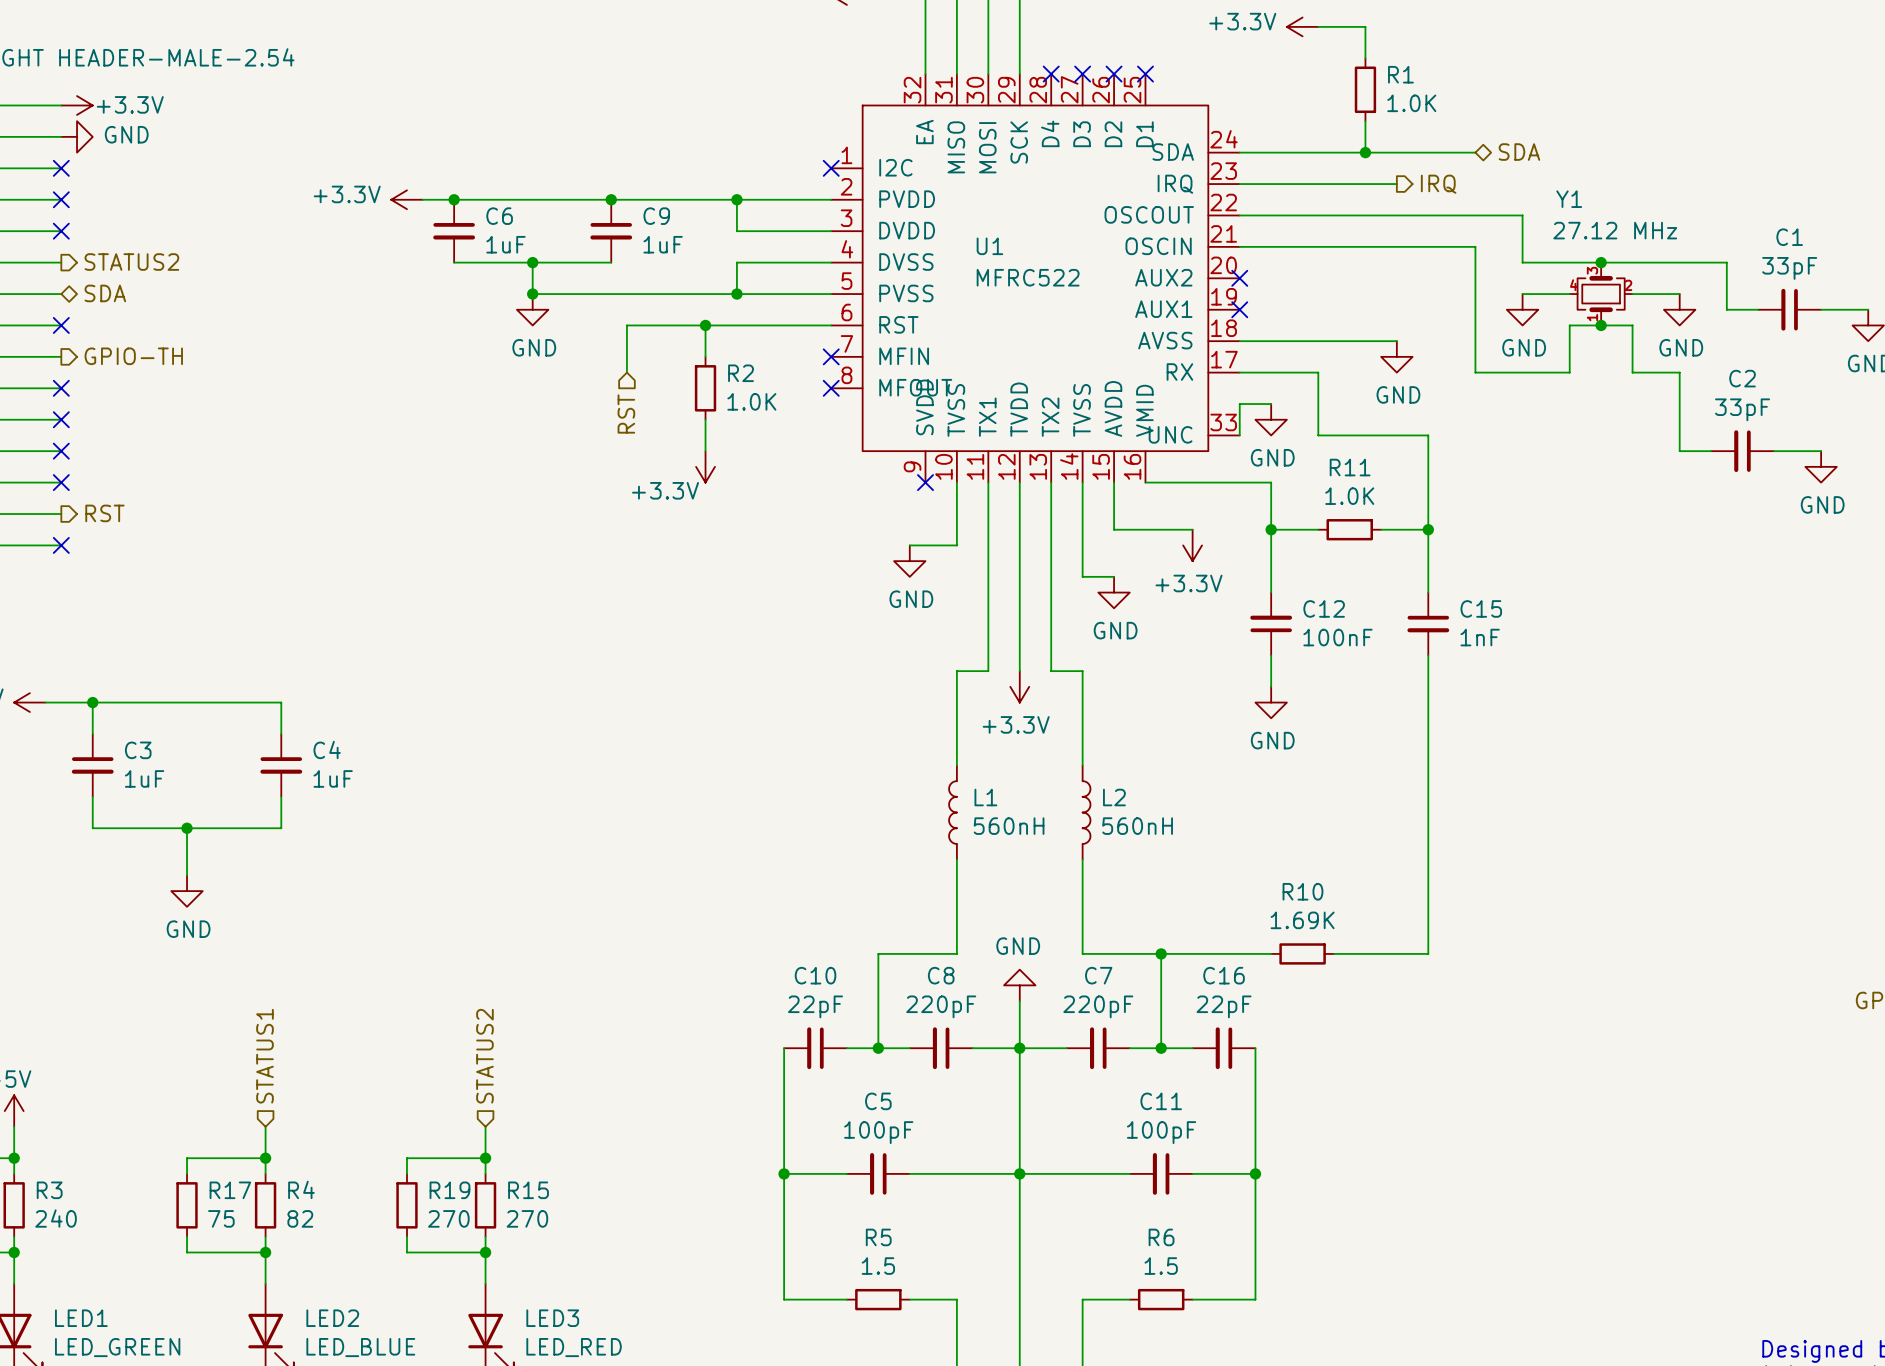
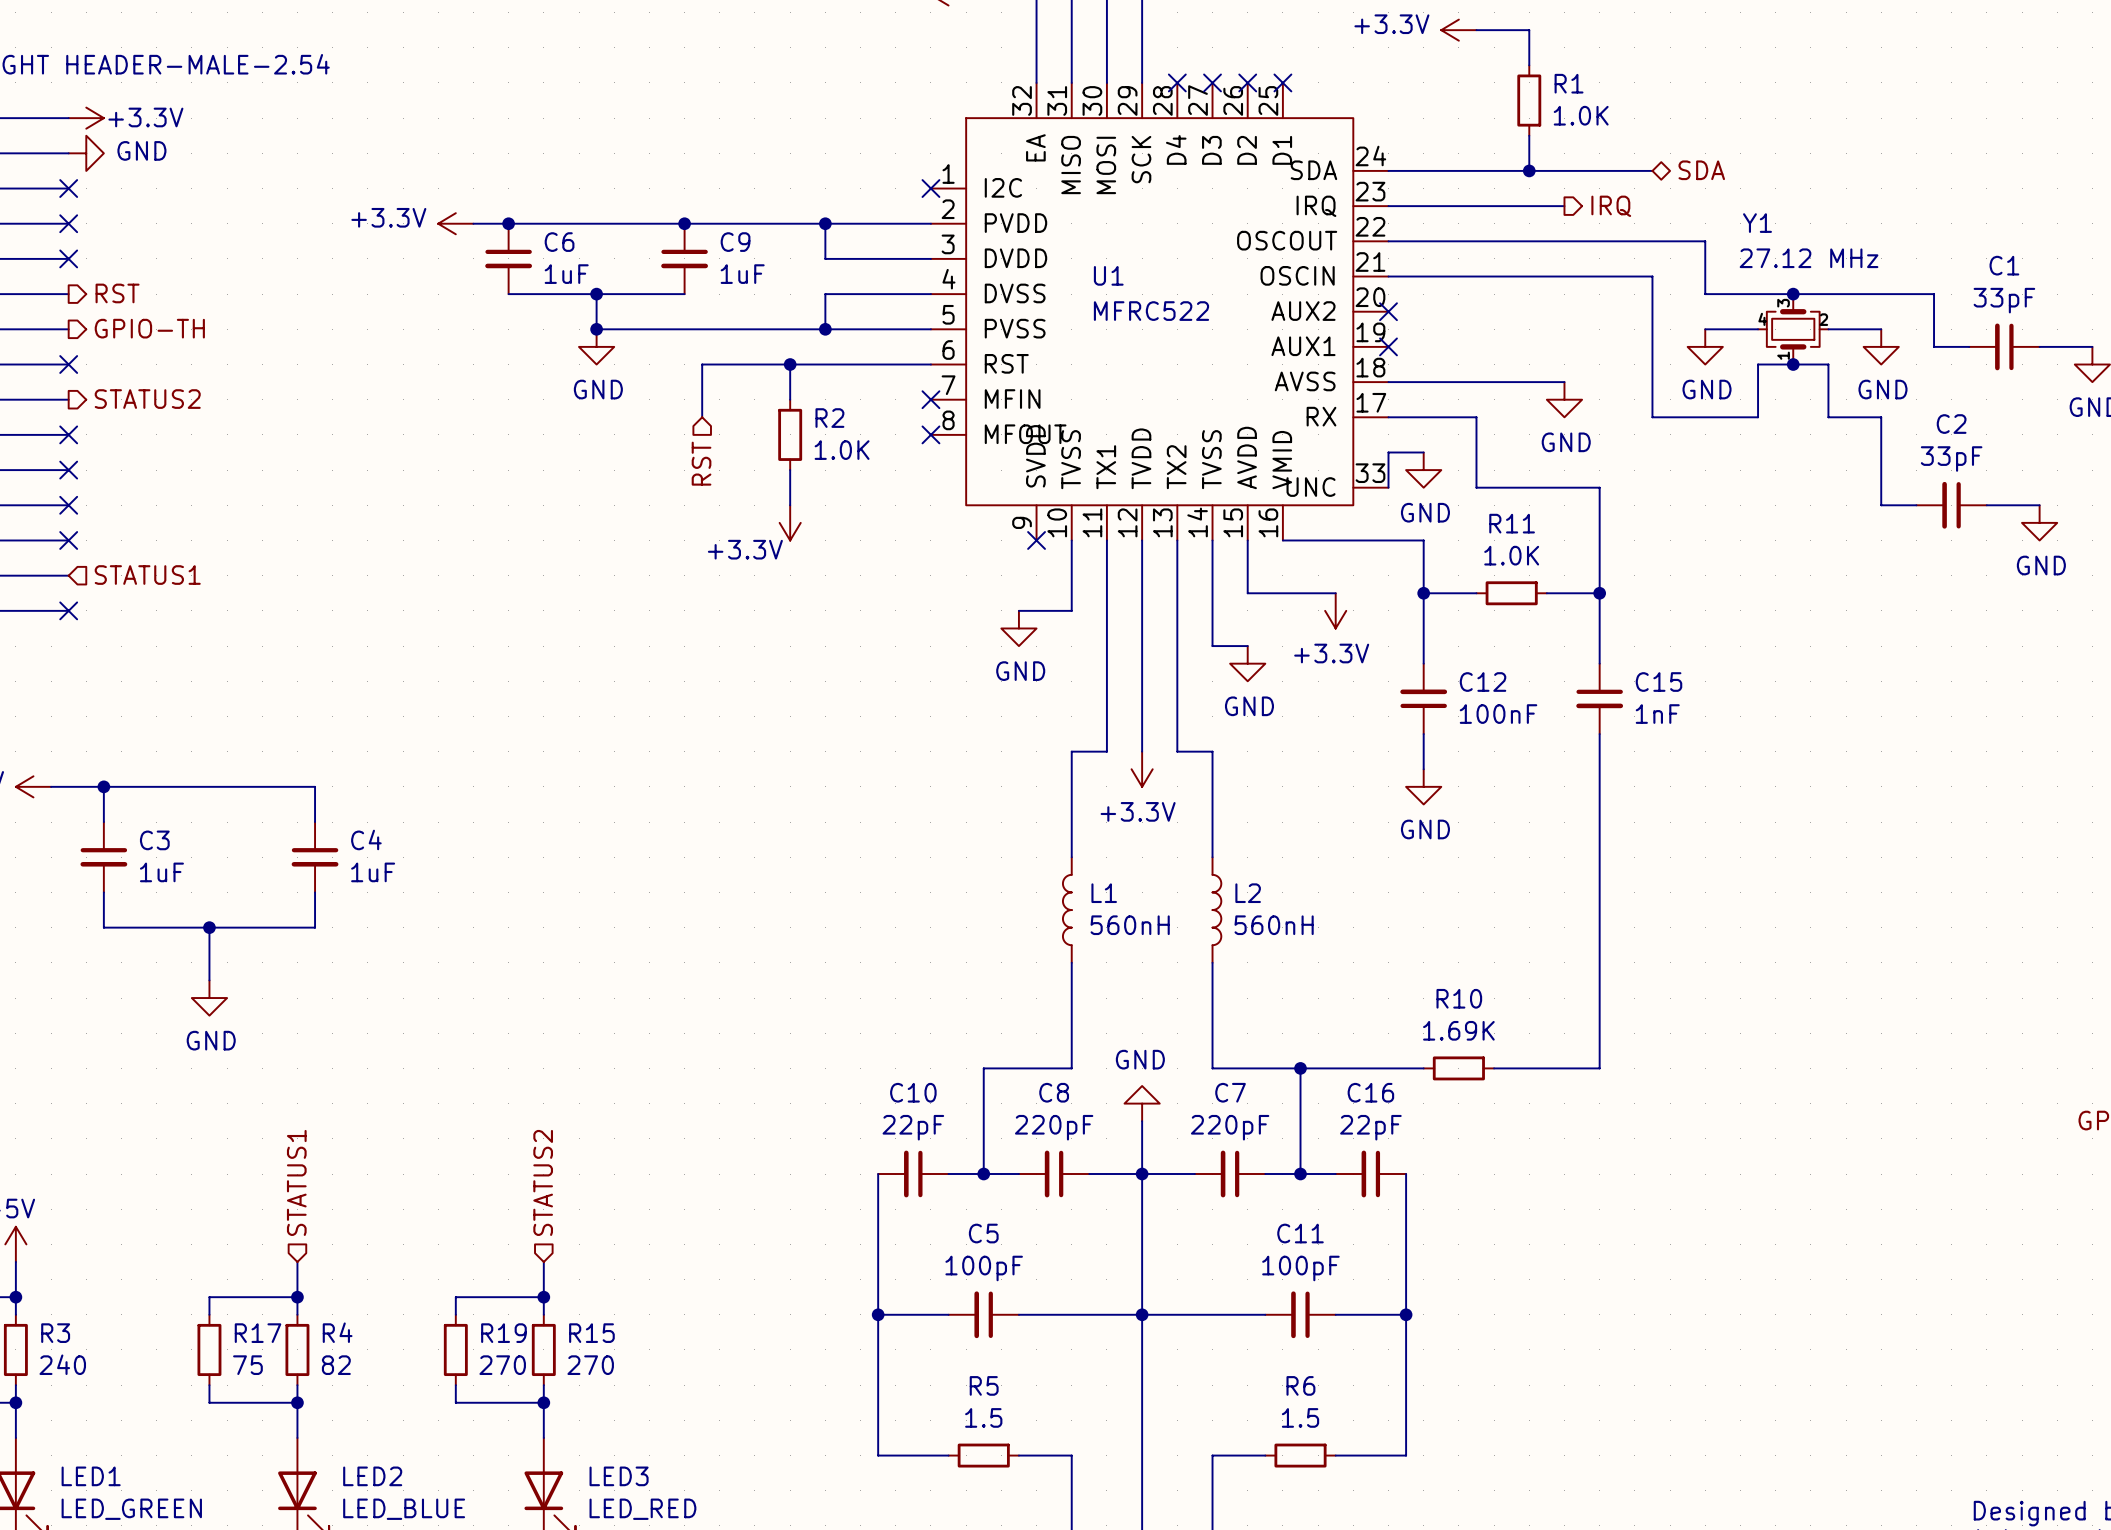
hierarchical label: STATUS2 (131, 262) -> RST (117, 293)
hierarchical label shape: bidirectional (105, 293) -> output (149, 328)
hierarchical label: SDA (105, 293) -> GPIO-TH (149, 328)
hierarchical label: GPIO-TH (133, 356) -> STATUS2 (147, 399)
hierarchical label shape: output (104, 513) -> input (147, 575)
hierarchical label: RST (104, 513) -> STATUS1 (147, 575)

